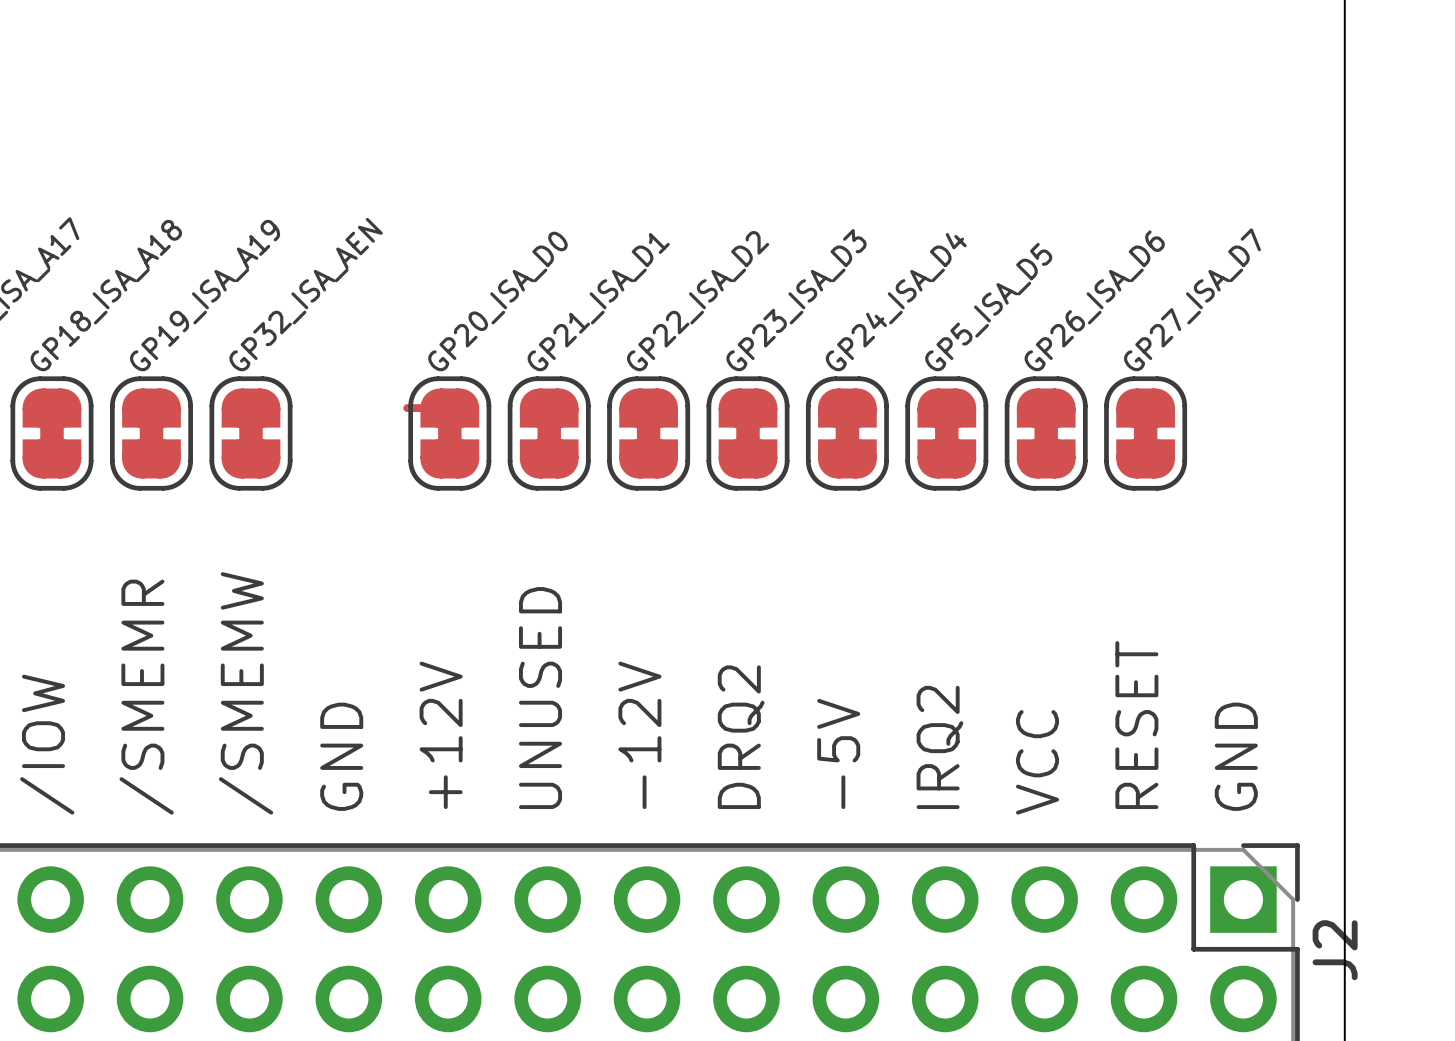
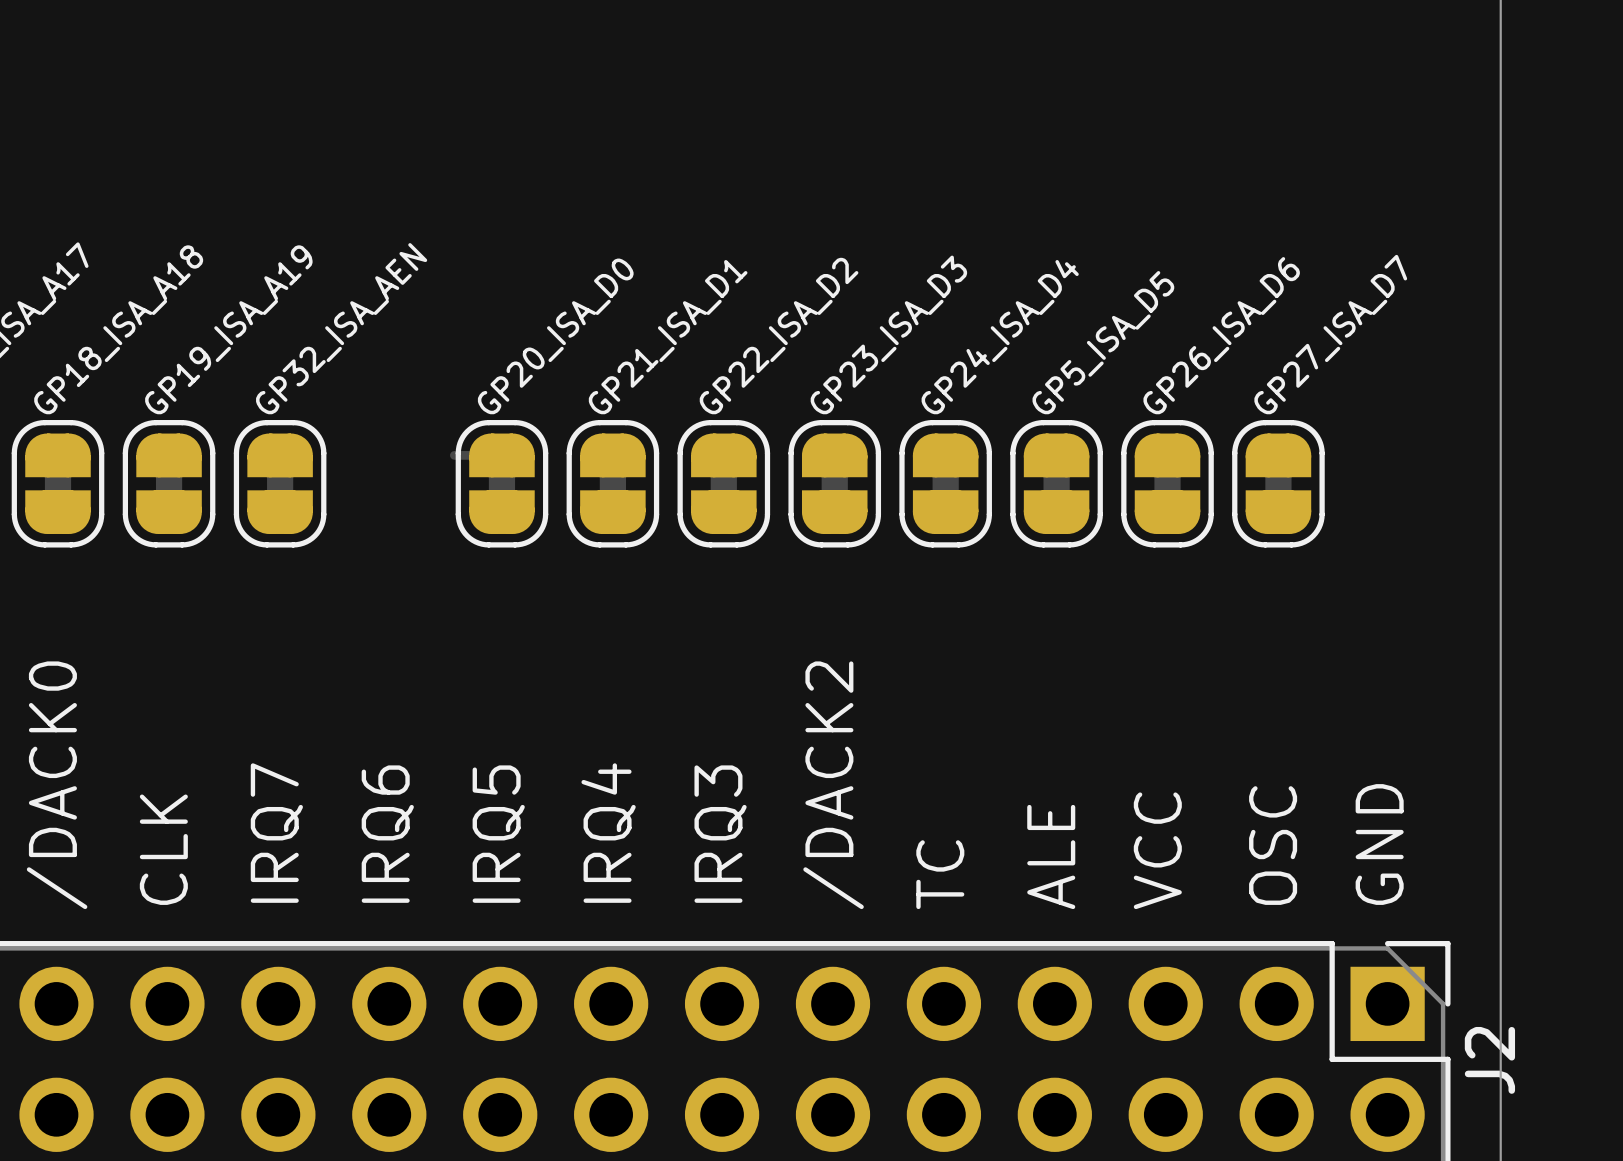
text: /SMEMW (246, 693) -> IRQ7 (276, 833)
text: /SMEMR (146, 697) -> CLK (163, 849)
text: UNUSED (540, 698) -> IRQ4 (608, 833)
text: RESET (1136, 725) -> OSC (1273, 845)
text: +12V (441, 735) -> IRQ5 (498, 834)
text: -12V (639, 735) -> IRQ3 (720, 834)
text: DRQ2 (741, 737) -> /DACK2 (833, 785)
text: /IOW (47, 744) -> /DACK0 (57, 785)
text: IRQ2 (939, 747) -> ALE (1051, 856)
text: -5V (838, 753) -> TC (940, 874)
text: GND (341, 756) -> IRQ6 (387, 834)

